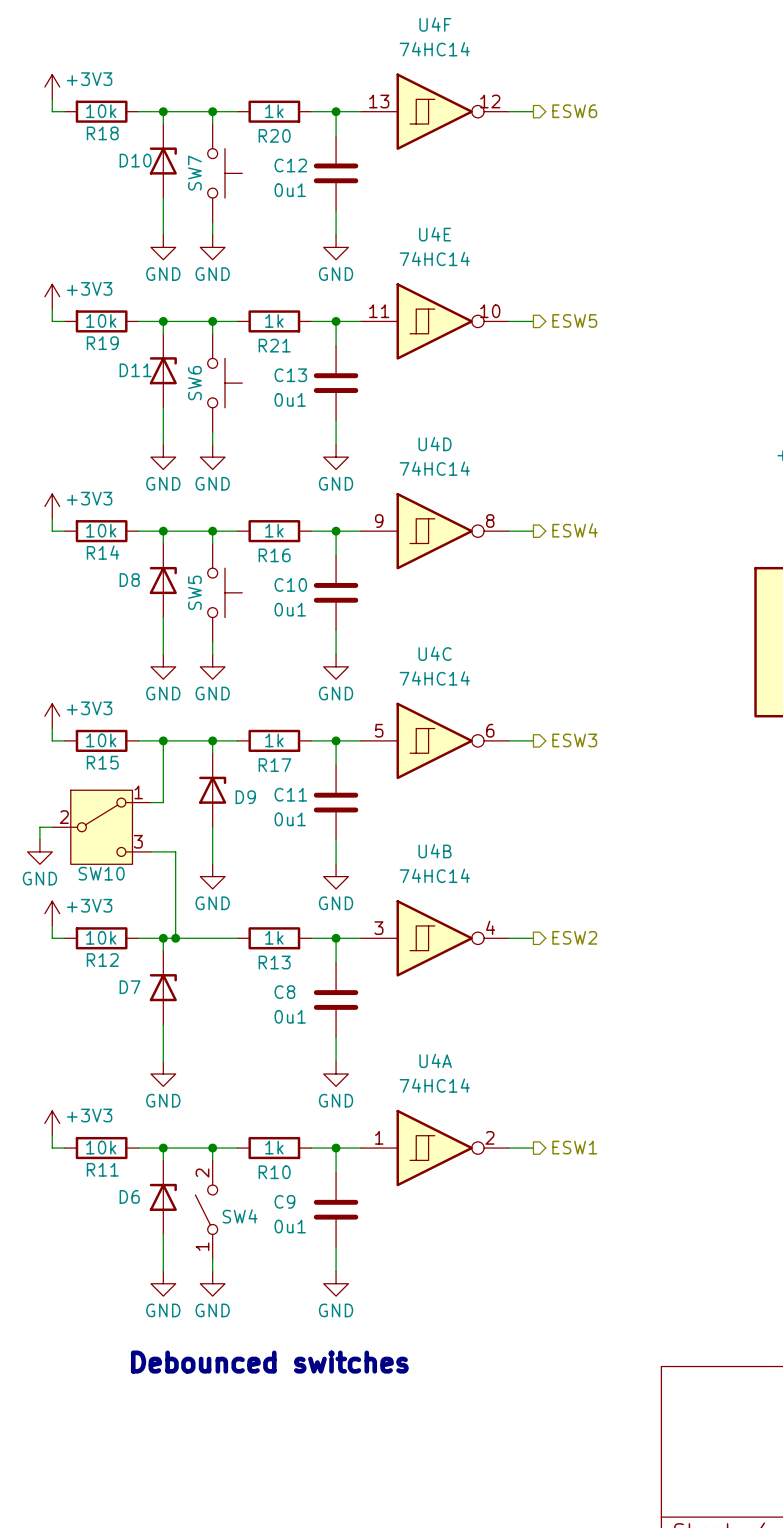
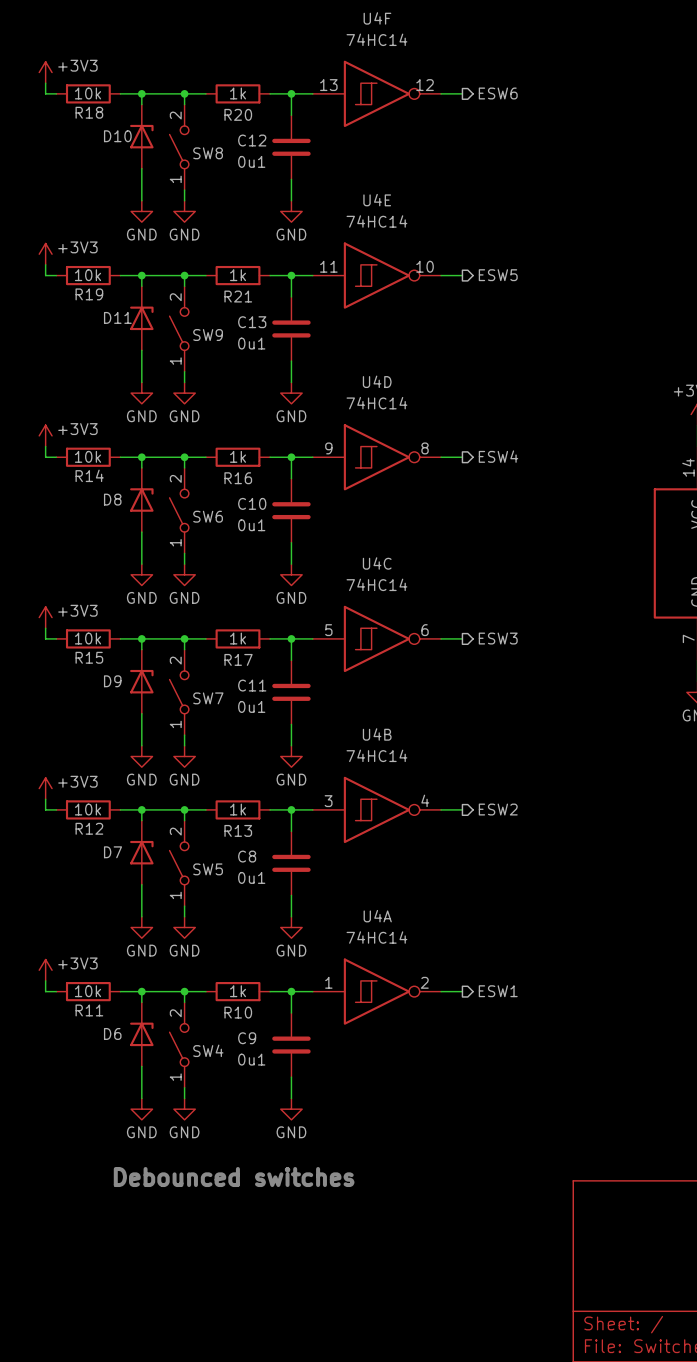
SW7 symbol: [207, 124, 243, 223] -> [169, 649, 189, 736]
SW7 name position: SW7 (194, 173) -> SW7 (208, 698)
SW8: none -> (179, 147)
SW6 symbol: [207, 333, 243, 433] -> [169, 467, 189, 554]
SW6 name position: SW6 (194, 383) -> SW6 (208, 516)
SW9: none -> (179, 329)
SW5 symbol: [207, 543, 243, 643] -> [169, 820, 189, 907]
SW5 name position: SW5 (194, 592) -> SW5 (208, 869)
D9 position: (212, 790) -> (141, 681)
D9 name position: D9 (245, 797) -> D9 (112, 681)
wire: (52, 827) (39, 827) (39, 839) -> none
SW10: (101, 827) -> none
wire: none -> (141, 713) (141, 745)
power symbol position: GND (39, 851) -> GND (141, 756)
wire: (150, 851) (175, 851) (175, 938) -> none
junction position: (175, 938) -> (184, 809)
wire: none -> (184, 809) (184, 820)
wire: none -> (184, 906) (184, 916)
power symbol: none -> GND (184, 927)

